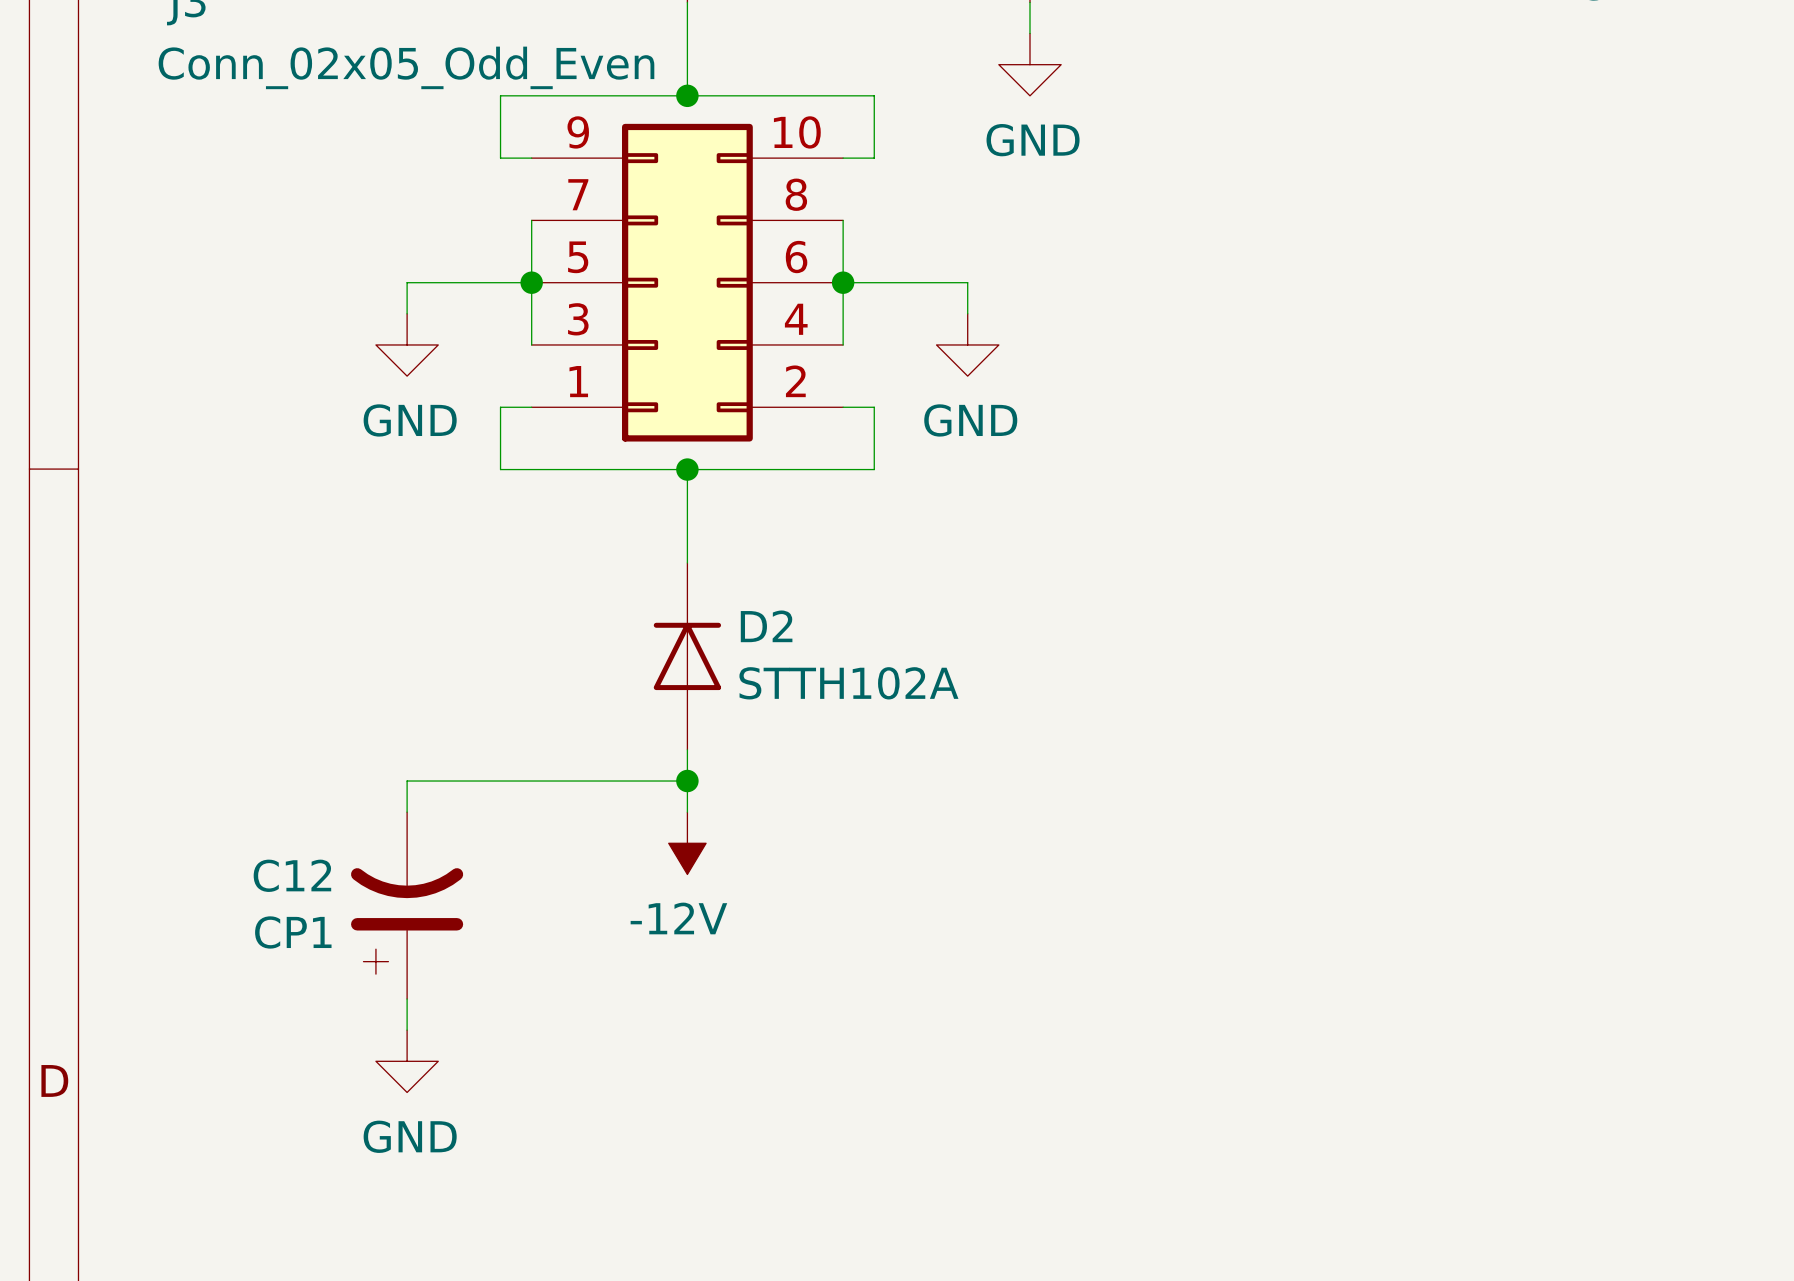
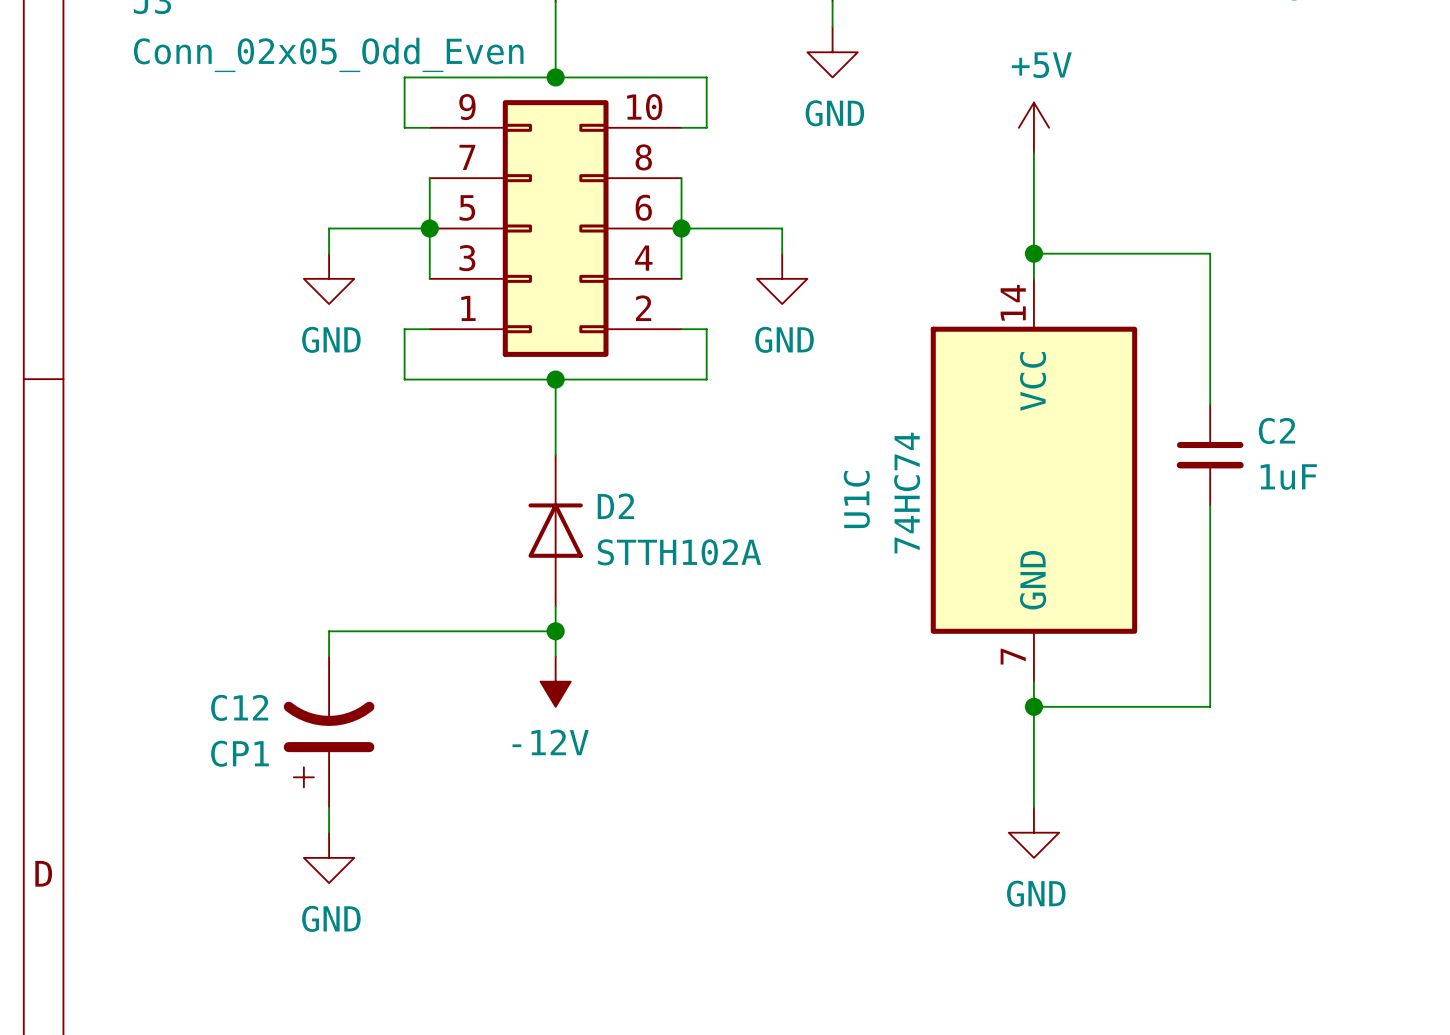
power symbol: none -> +5V (1033, 127)
wire: none -> (1033, 152) (1033, 278)
wire: none -> (1033, 253) (1210, 253) (1210, 404)
junction: none -> (1033, 253)
C2: none -> 1uF (1210, 455)
U1C: none -> 74HC74 (1033, 480)
wire: none -> (1210, 505) (1210, 706) (1033, 706)
wire: none -> (1033, 681) (1033, 807)
junction: none -> (1033, 706)
power symbol: none -> GND (1033, 832)

